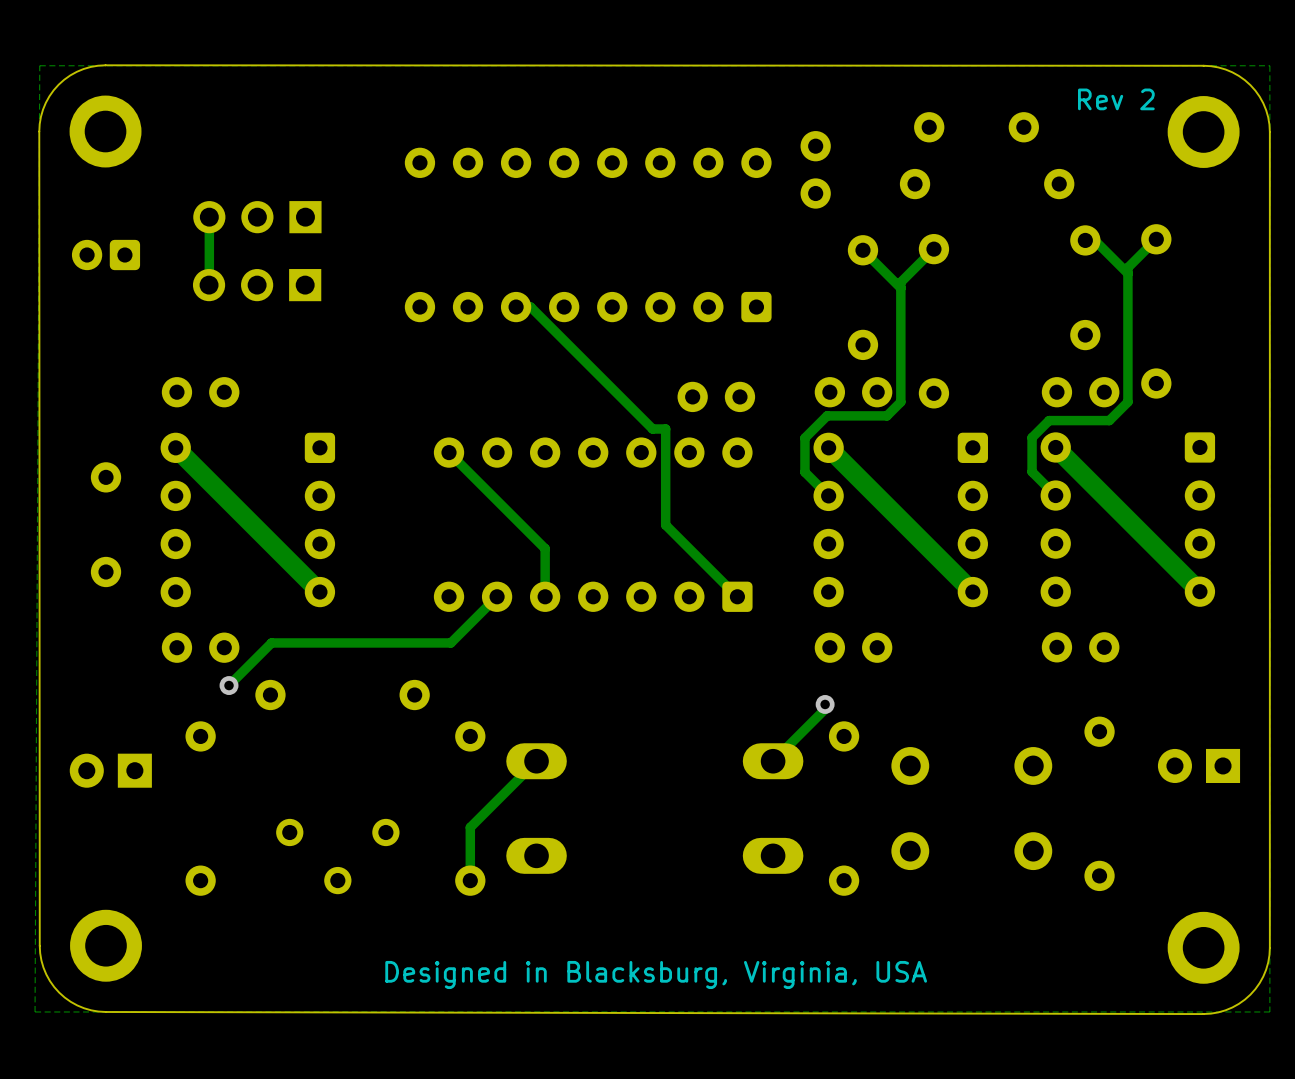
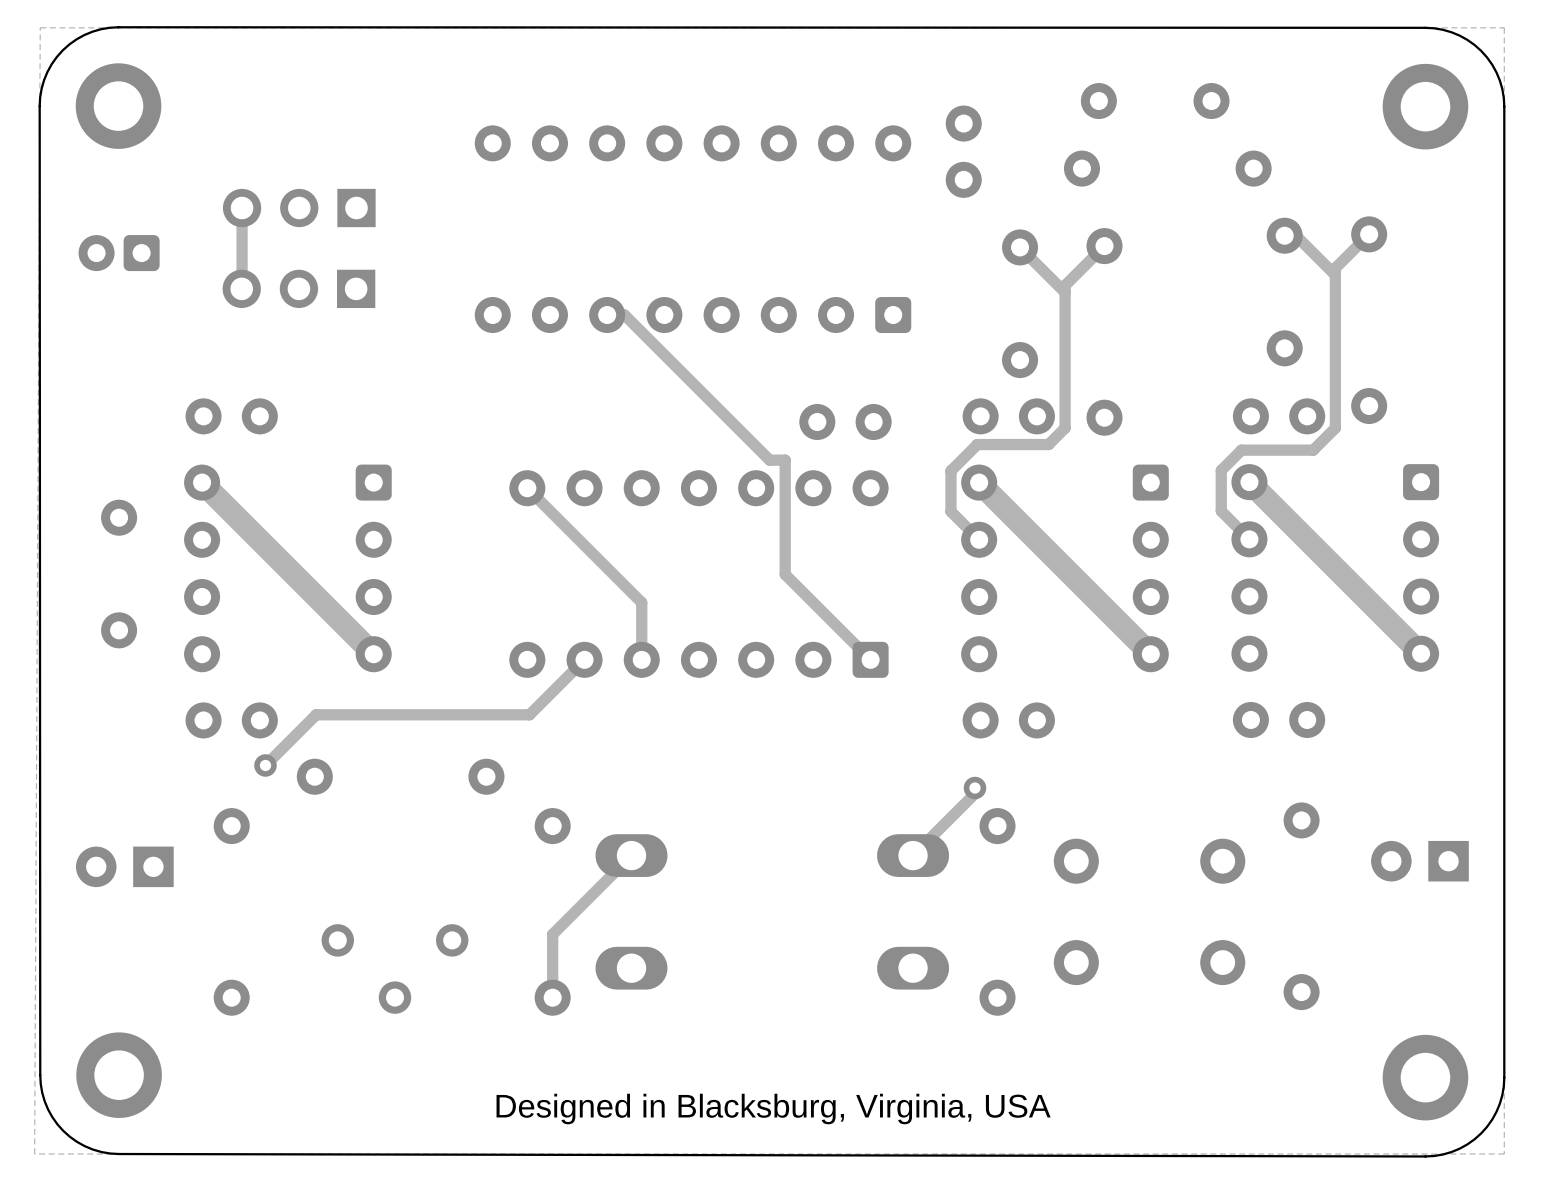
text: Rev 2 (1116, 99) -> none

